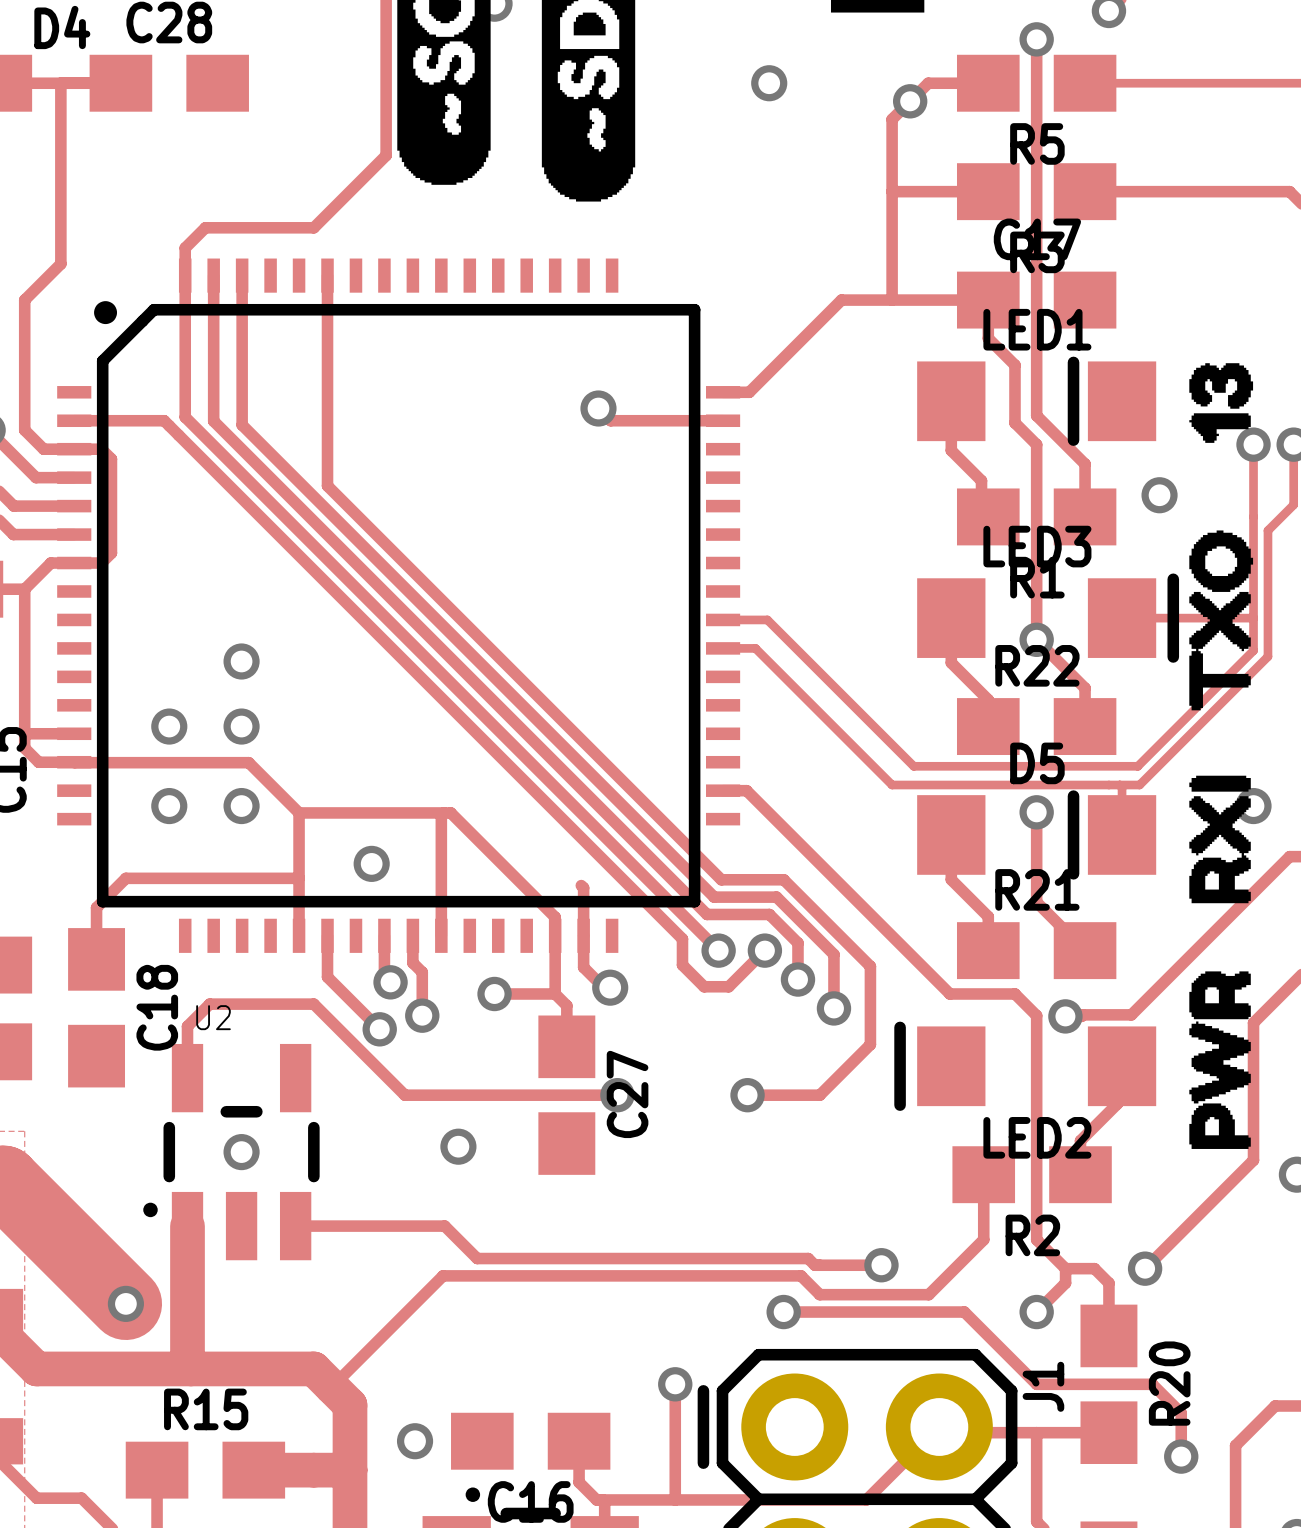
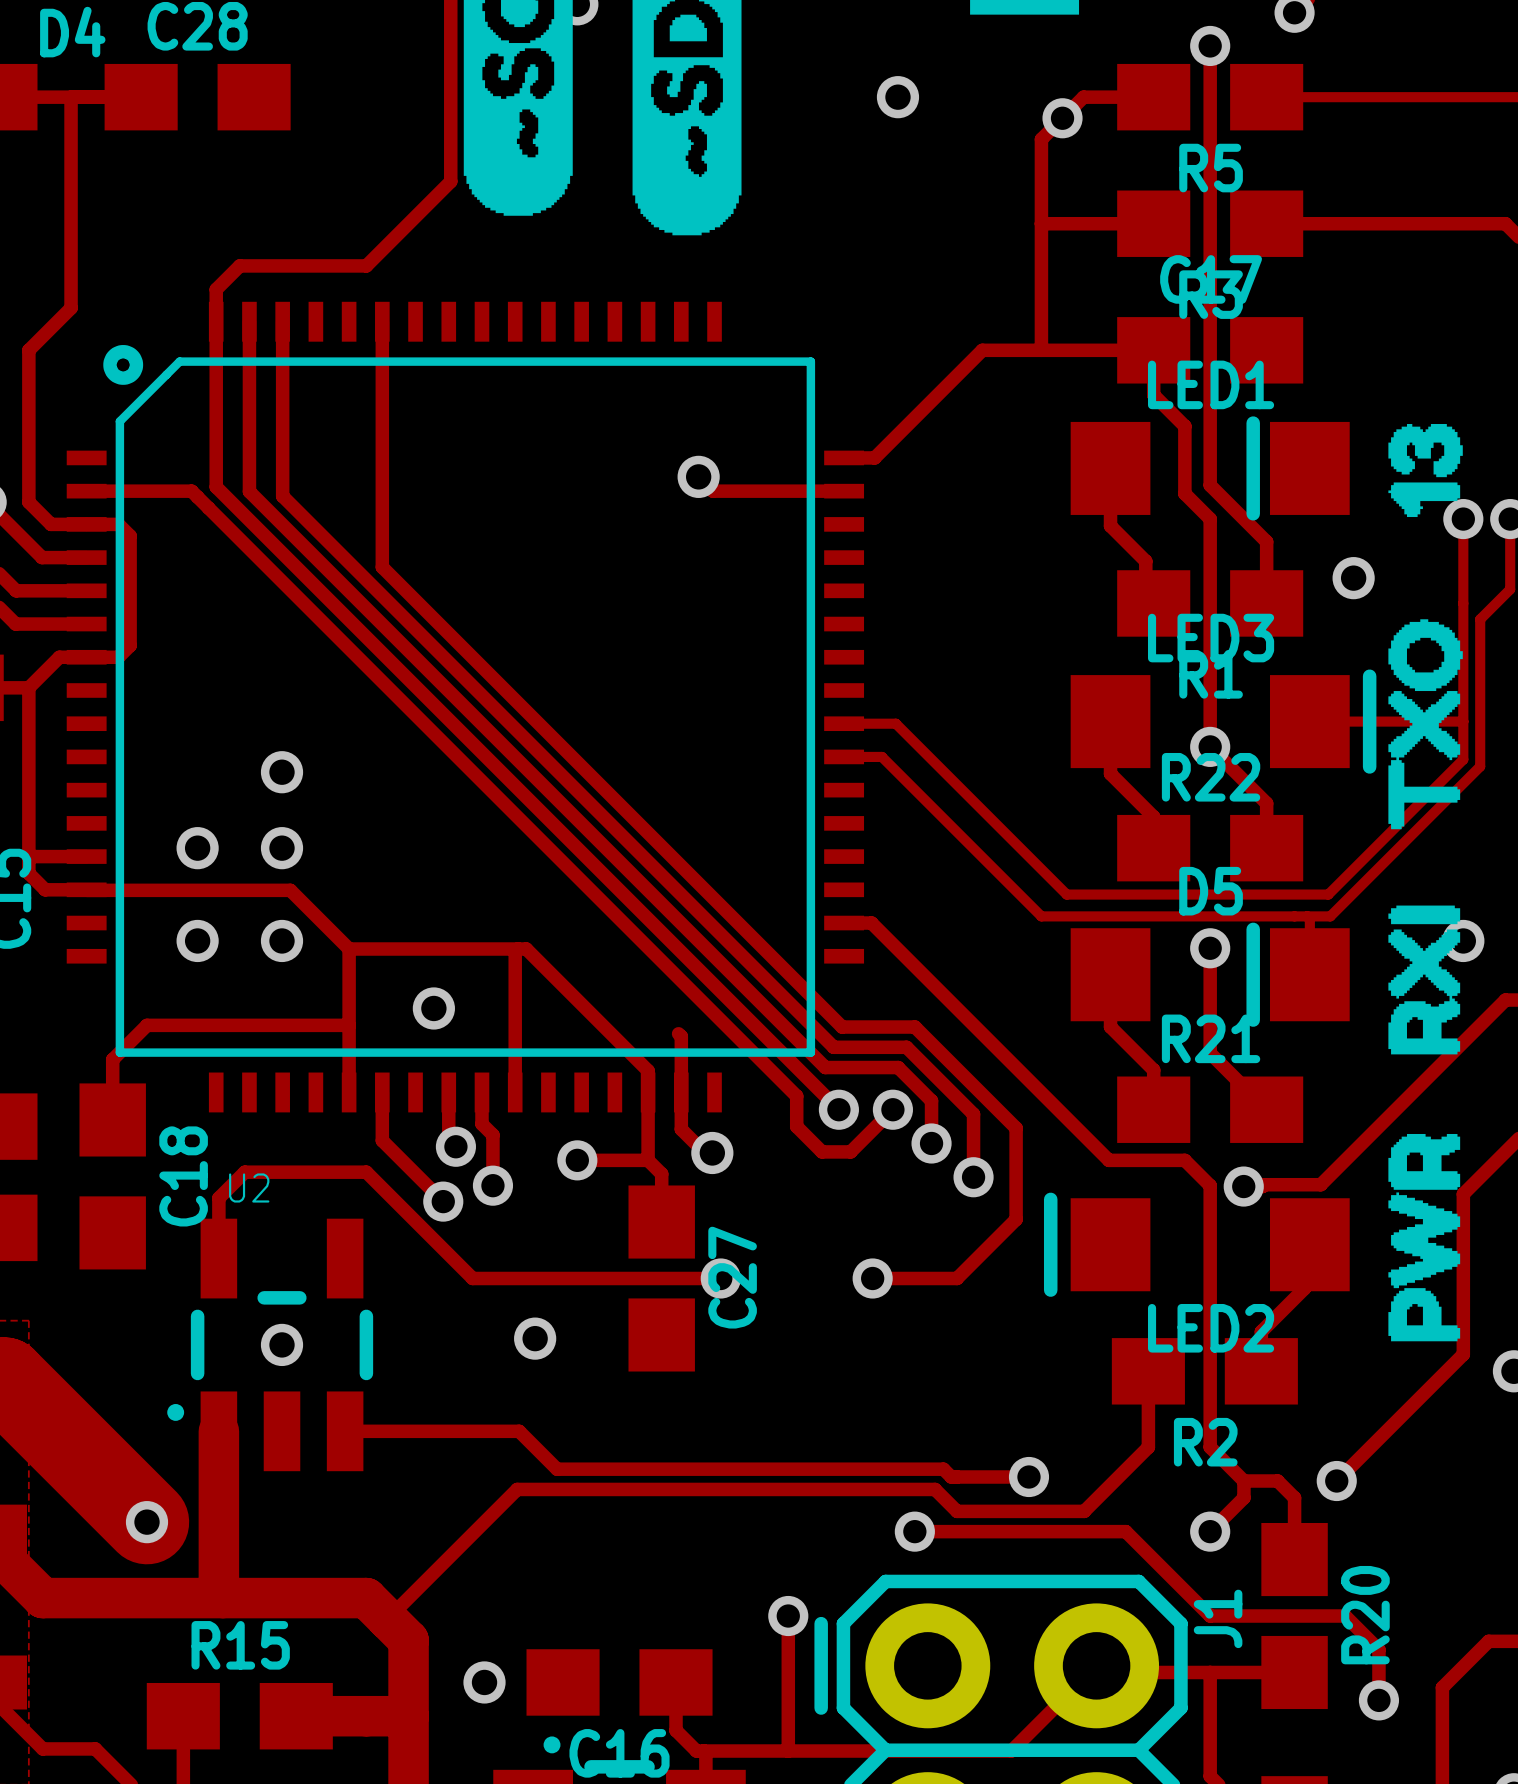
part footprint: [57, 258, 741, 953] -> [66, 301, 865, 1113]

